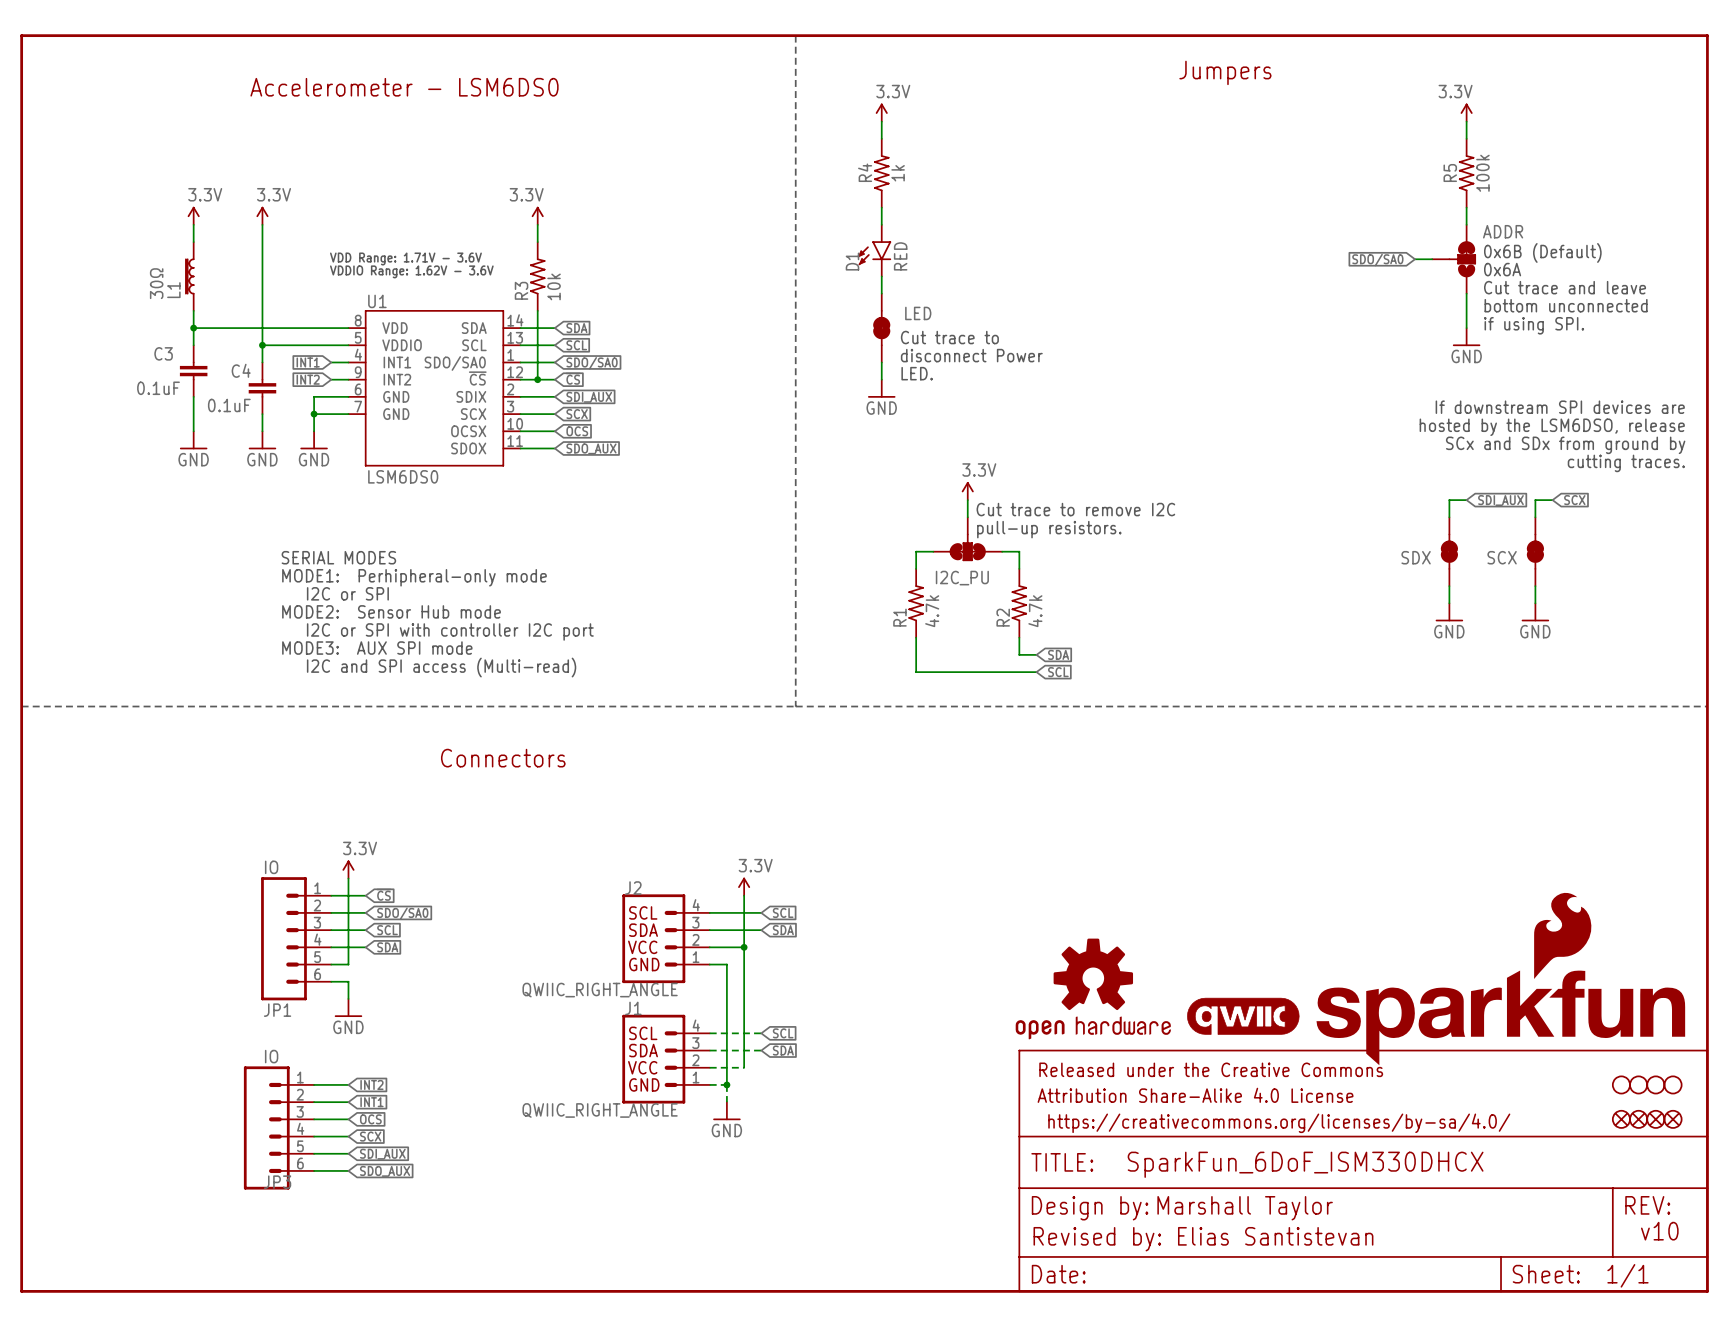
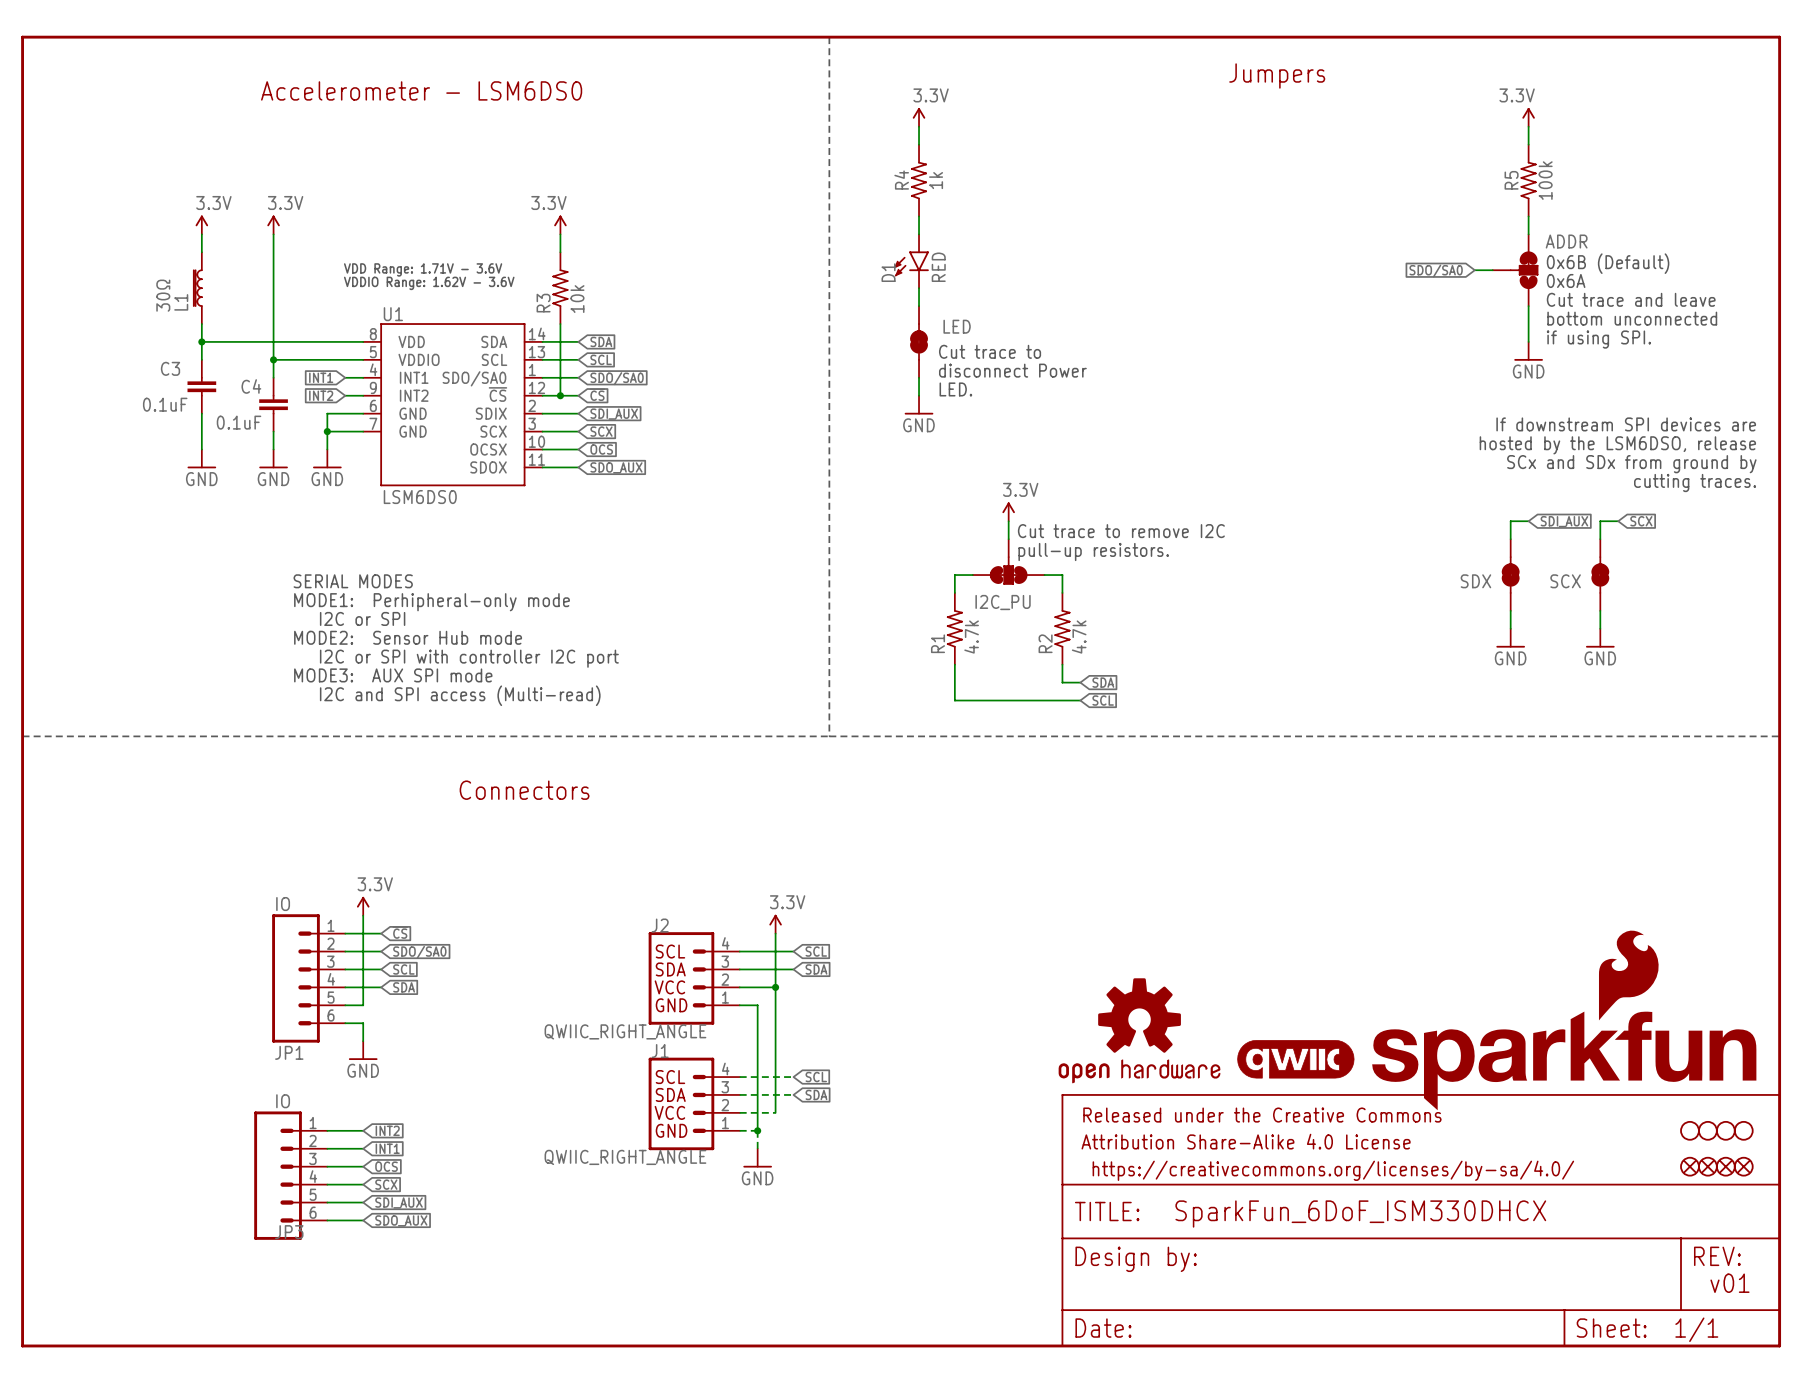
part text: Marshall Taylor (1245, 1208) -> none
text: v10 (1659, 1231) -> v01 (1729, 1283)
text: Revised by: Elias Santistevan (1203, 1239) -> none

